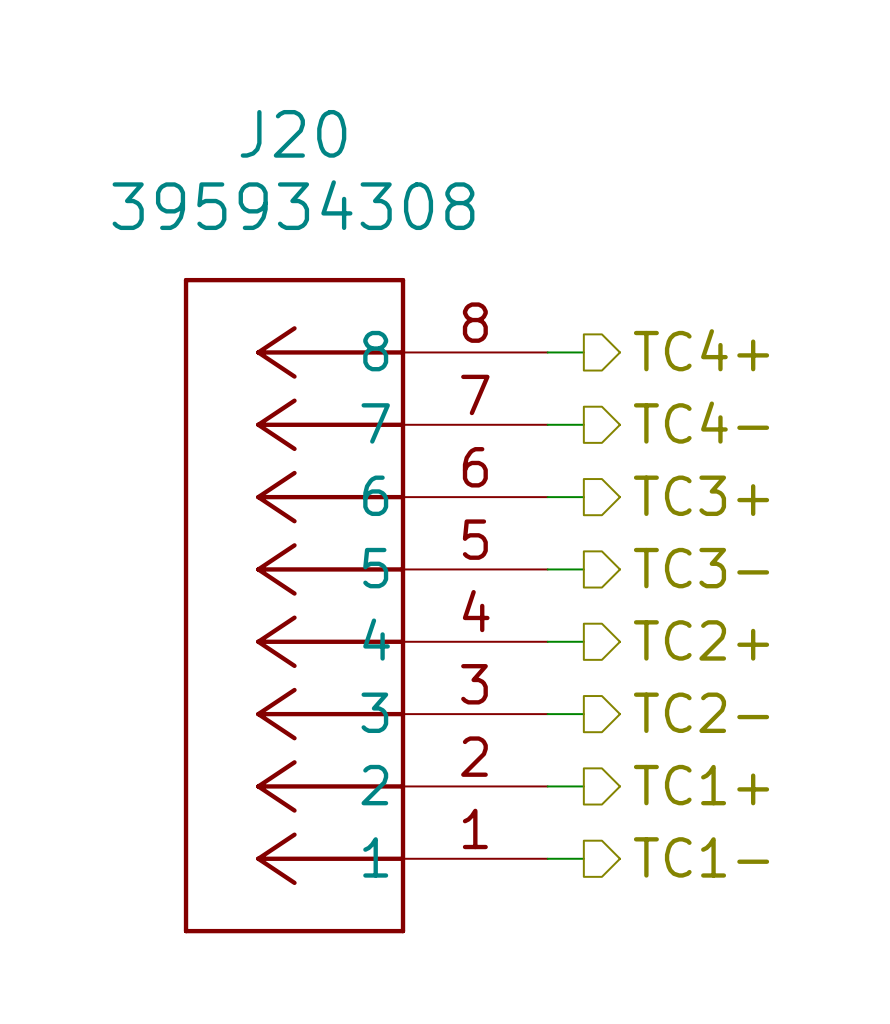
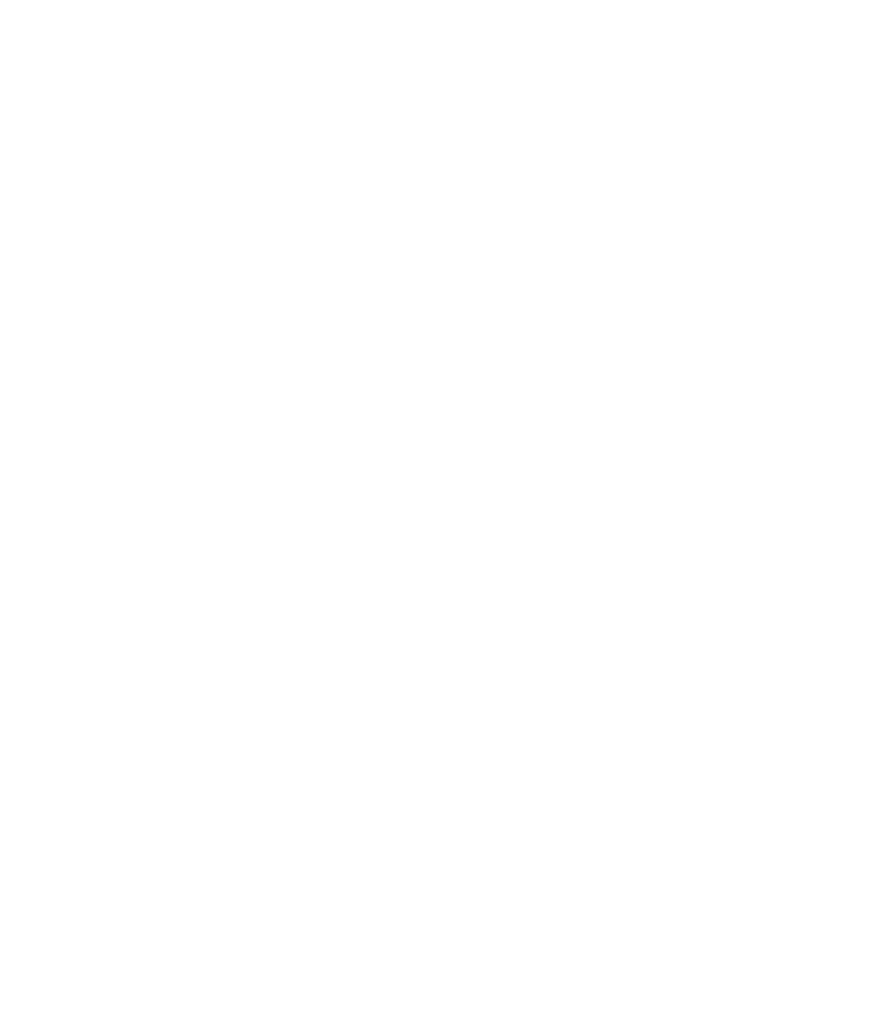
hierarchical label: TC4+ (701, 350) -> none
wire: (547, 352) (583, 352) -> none
hierarchical label: TC4- (701, 422) -> none
wire: (547, 424) (583, 424) -> none
hierarchical label: TC3+ (701, 495) -> none
wire: (547, 497) (583, 497) -> none
hierarchical label: TC3- (701, 568) -> none
wire: (547, 569) (583, 569) -> none
J20: 395934308 (365, 605) -> none
hierarchical label: TC2+ (701, 640) -> none
wire: (547, 641) (583, 641) -> none
hierarchical label: TC2- (701, 712) -> none
wire: (547, 714) (583, 714) -> none
hierarchical label: TC1+ (701, 785) -> none
wire: (547, 786) (583, 786) -> none
hierarchical label: TC1- (701, 857) -> none
wire: (547, 858) (583, 858) -> none

